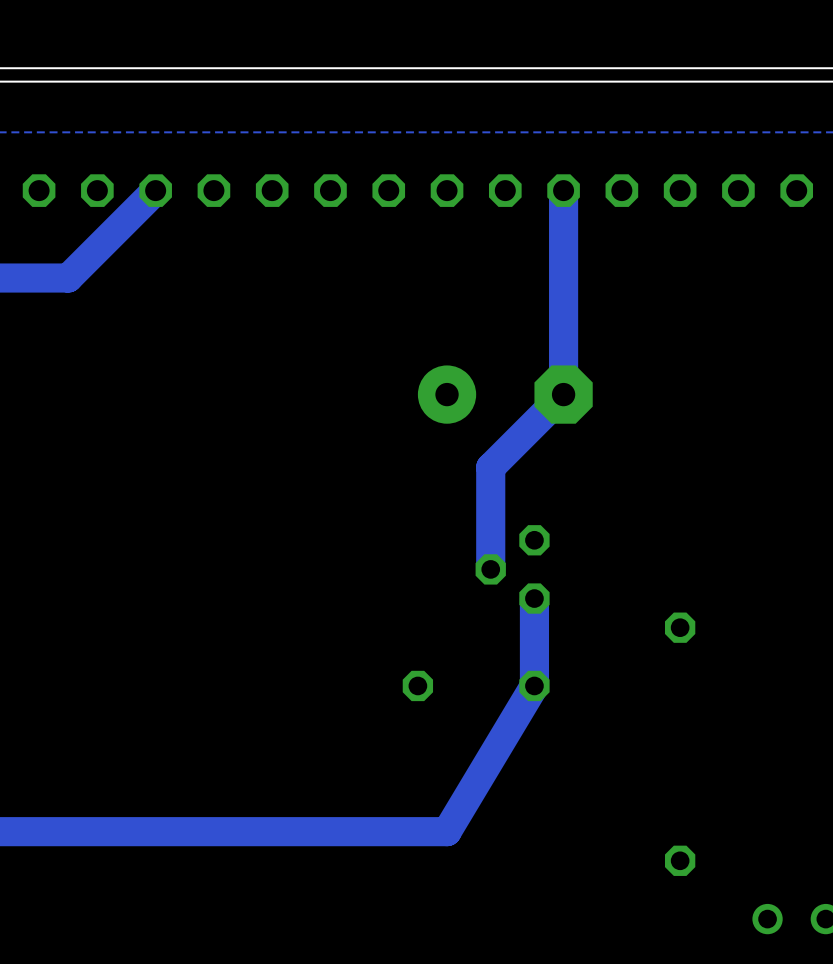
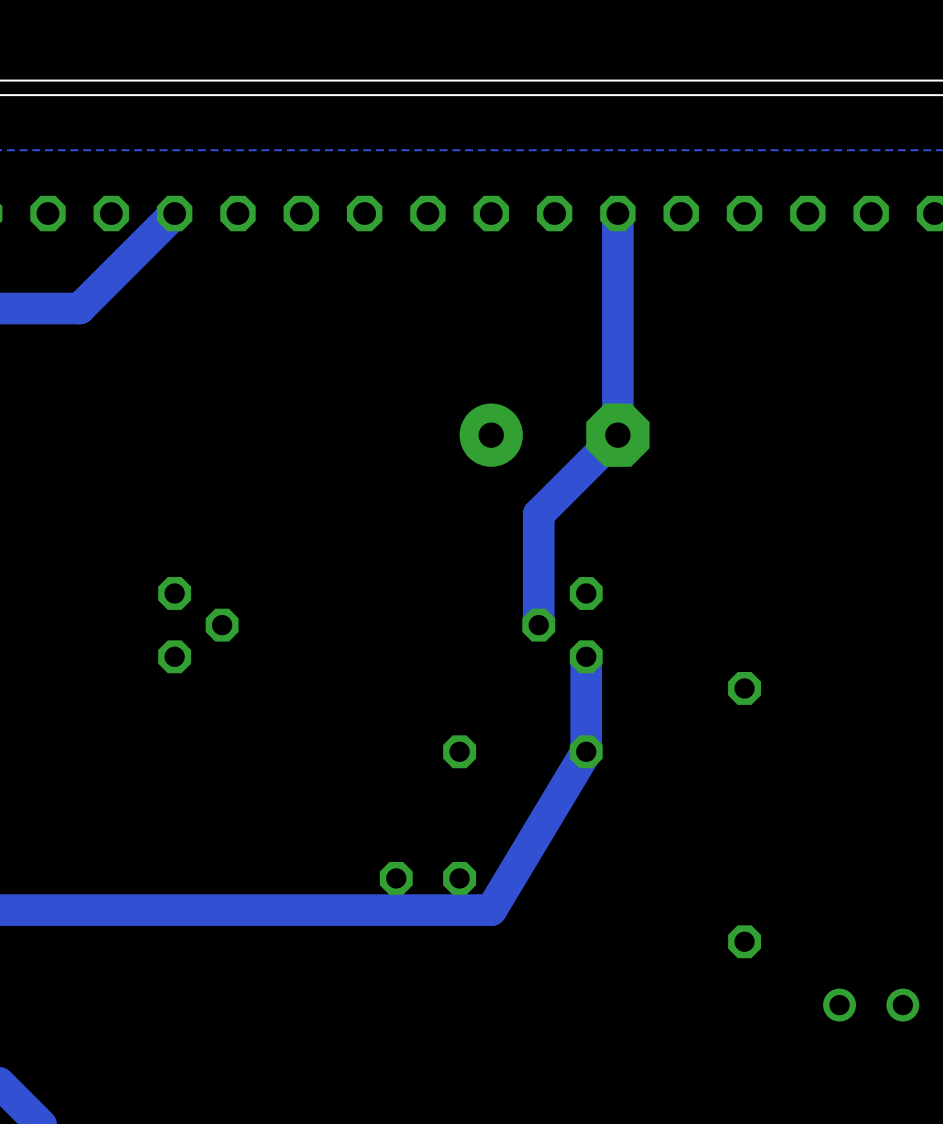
part: none -> (198, 625)
part: none -> (427, 878)

